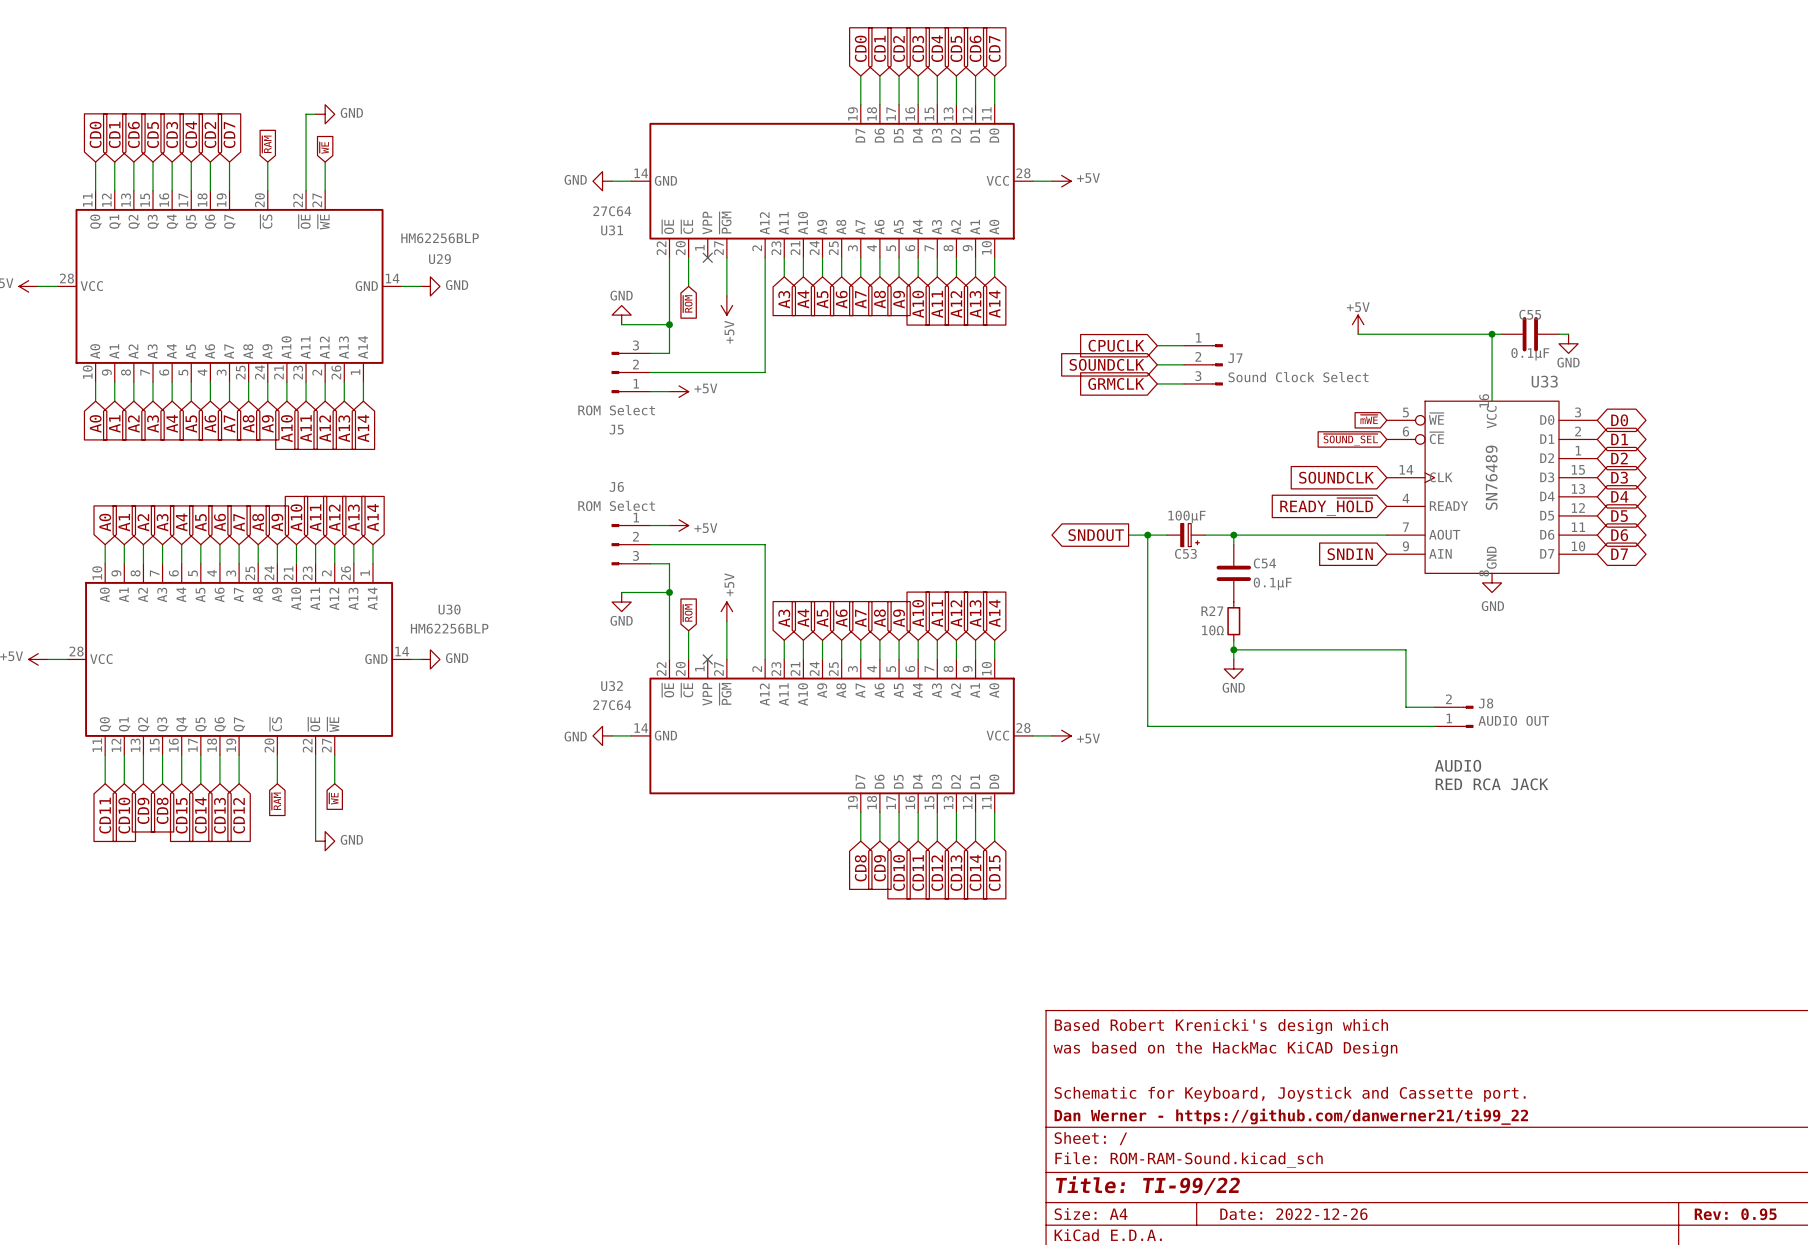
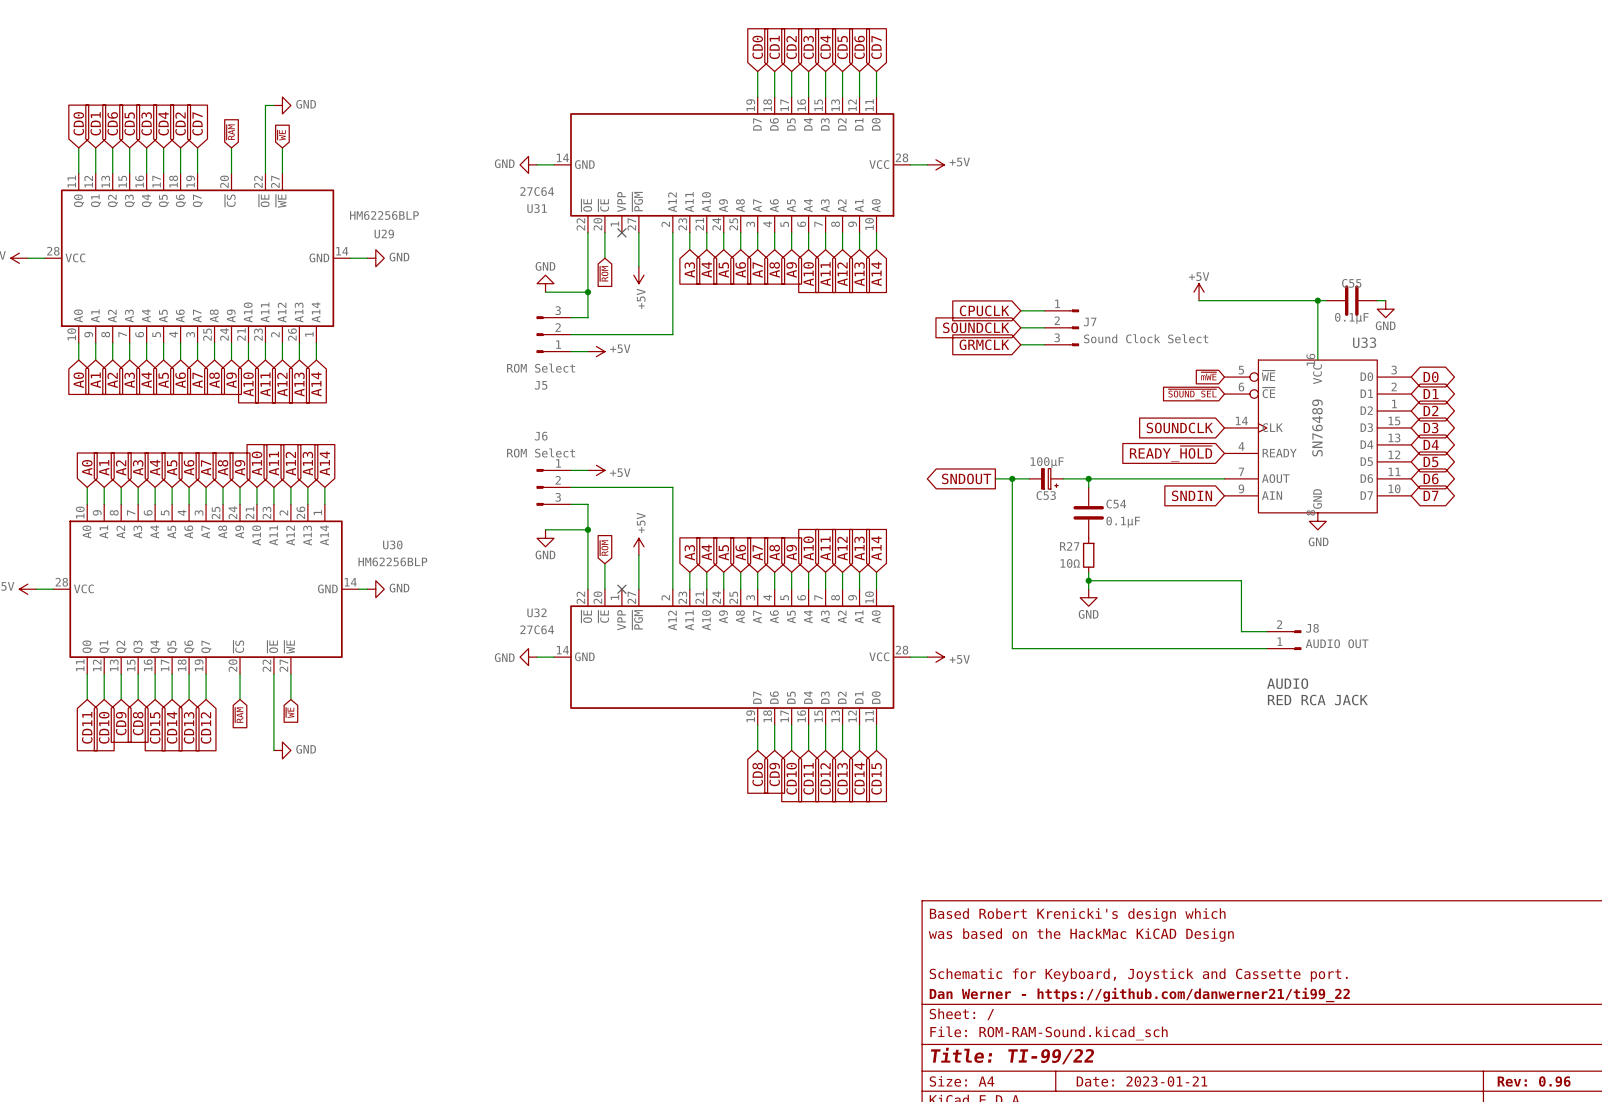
title block: Date: 2022-12-26 (1293, 1214) -> Date: 2023-01-21 (1142, 1081)
title block: Rev: 0.95 (1735, 1214) -> Rev: 0.96 (1534, 1081)

